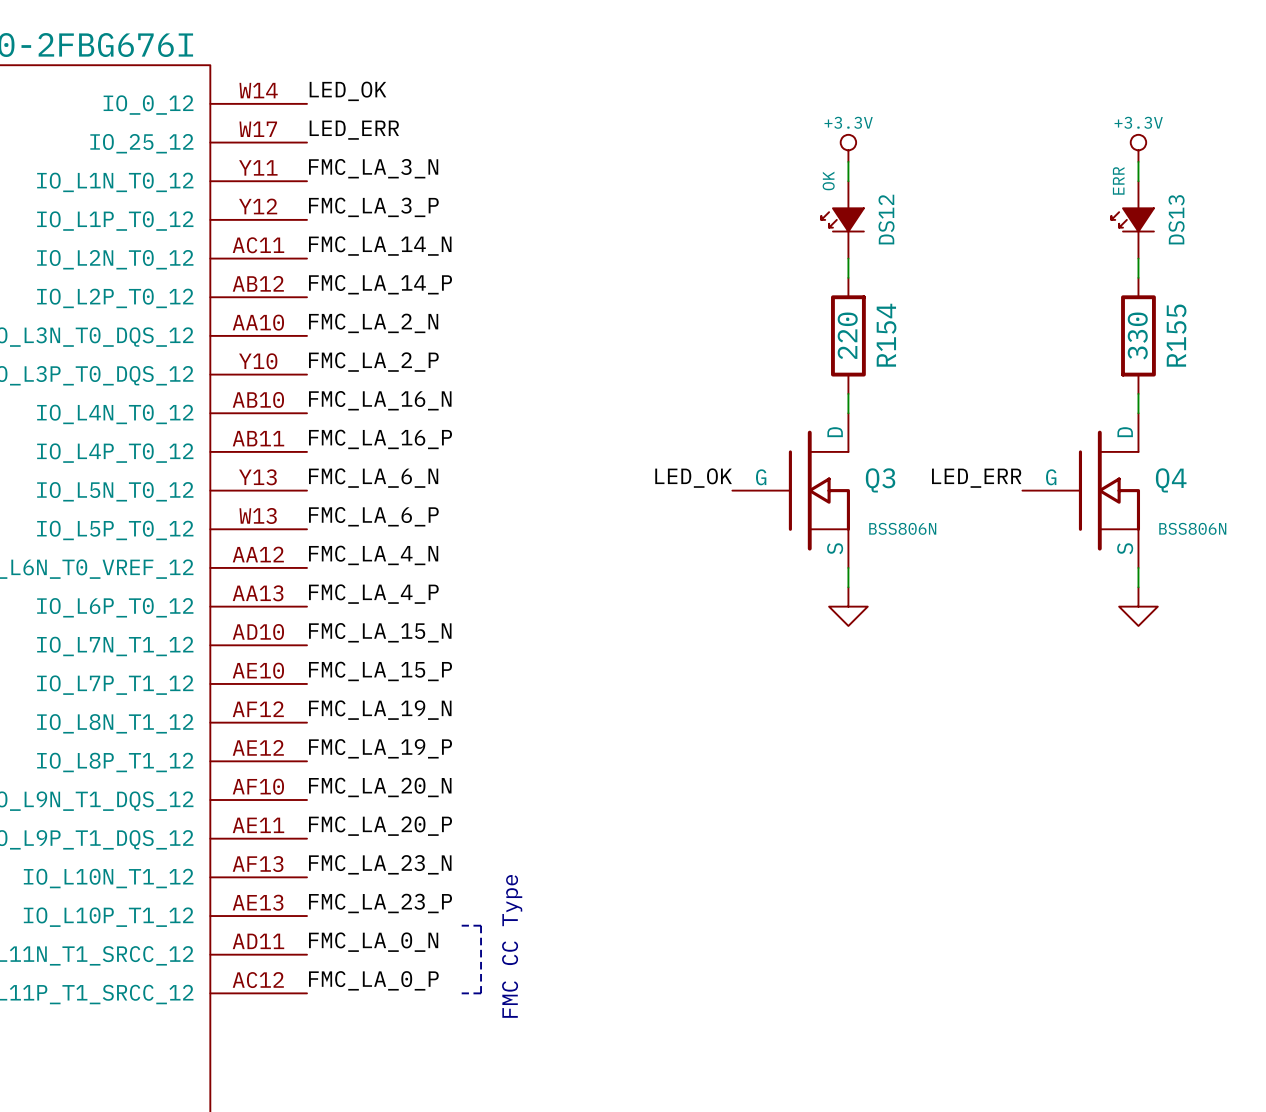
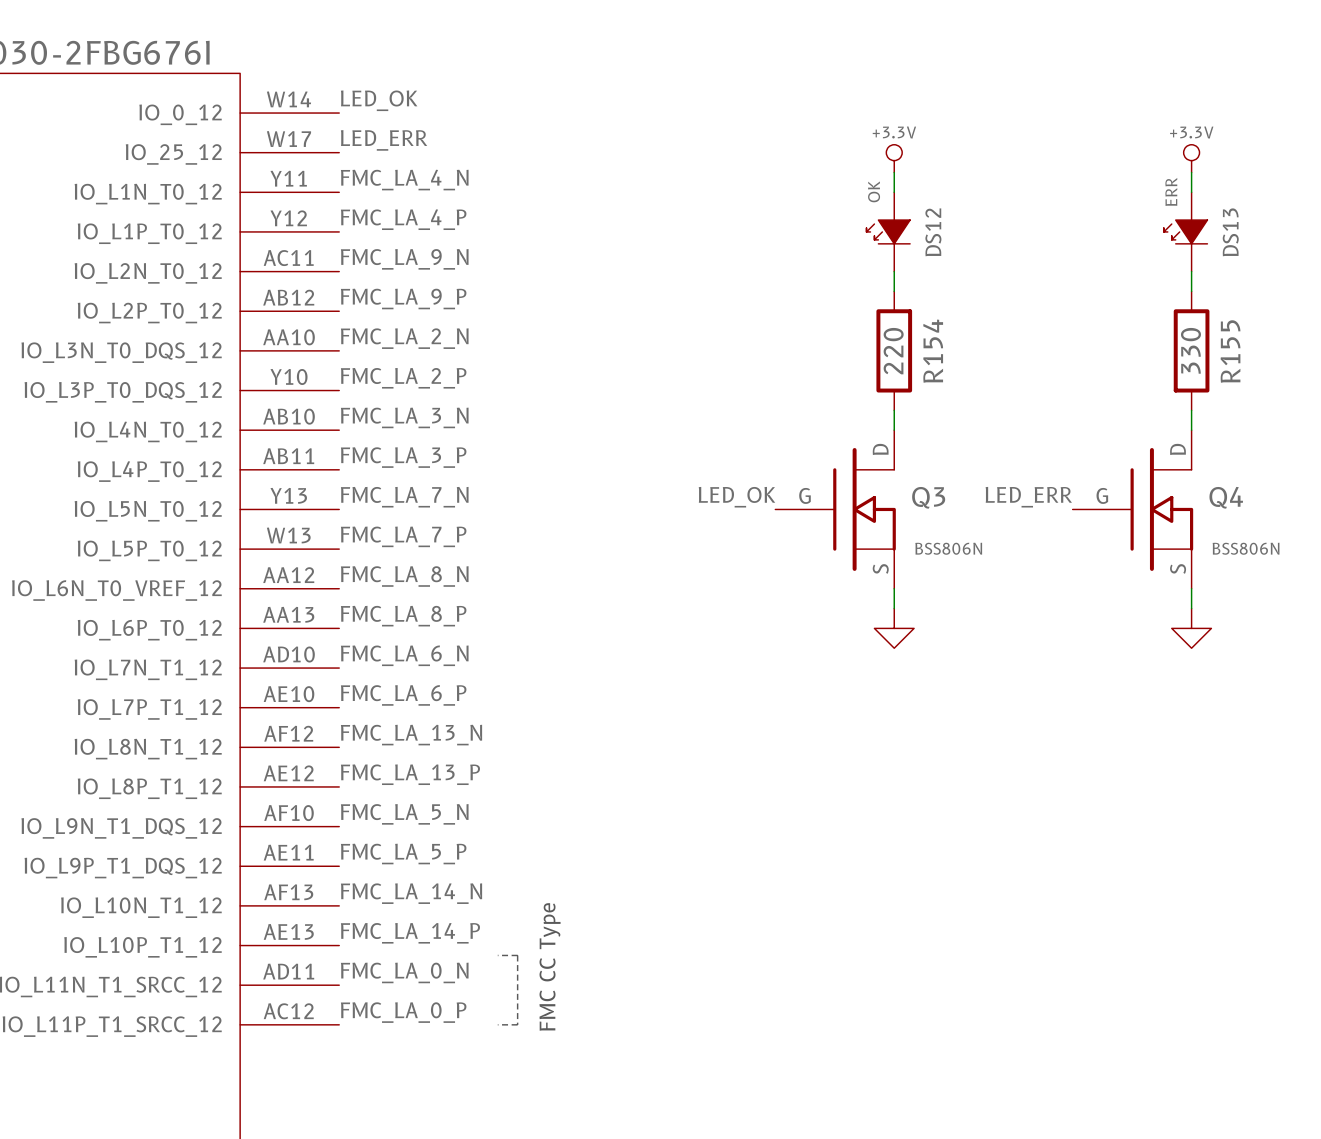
label: FMC_LA_3_N (373, 168) -> FMC_LA_4_N (404, 180)
label: FMC_LA_3_P (373, 207) -> FMC_LA_4_P (403, 219)
label: FMC_LA_14_N (380, 246) -> FMC_LA_9_N (404, 259)
label: FMC_LA_14_P (380, 284) -> FMC_LA_9_P (403, 298)
label: FMC_LA_16_N (380, 400) -> FMC_LA_3_N (404, 417)
label: FMC_LA_16_P (380, 439) -> FMC_LA_3_P (403, 457)
label: FMC_LA_6_N (373, 478) -> FMC_LA_7_N (404, 497)
label: FMC_LA_6_P (373, 516) -> FMC_LA_7_P (403, 536)
label: FMC_LA_4_N (373, 555) -> FMC_LA_8_N (404, 576)
label: FMC_LA_4_P (373, 594) -> FMC_LA_8_P (403, 616)
label: FMC_LA_15_N (380, 632) -> FMC_LA_6_N (404, 655)
label: FMC_LA_15_P (380, 671) -> FMC_LA_6_P (403, 695)
label: FMC_LA_19_N (380, 710) -> FMC_LA_13_N (411, 735)
label: FMC_LA_19_P (380, 748) -> FMC_LA_13_P (410, 774)
label: FMC_LA_20_N (380, 787) -> FMC_LA_5_N (404, 814)
label: FMC_LA_20_P (380, 826) -> FMC_LA_5_P (403, 854)
label: FMC_LA_23_N (380, 864) -> FMC_LA_14_N (411, 893)
label: FMC_LA_23_P (380, 903) -> FMC_LA_14_P (410, 933)

